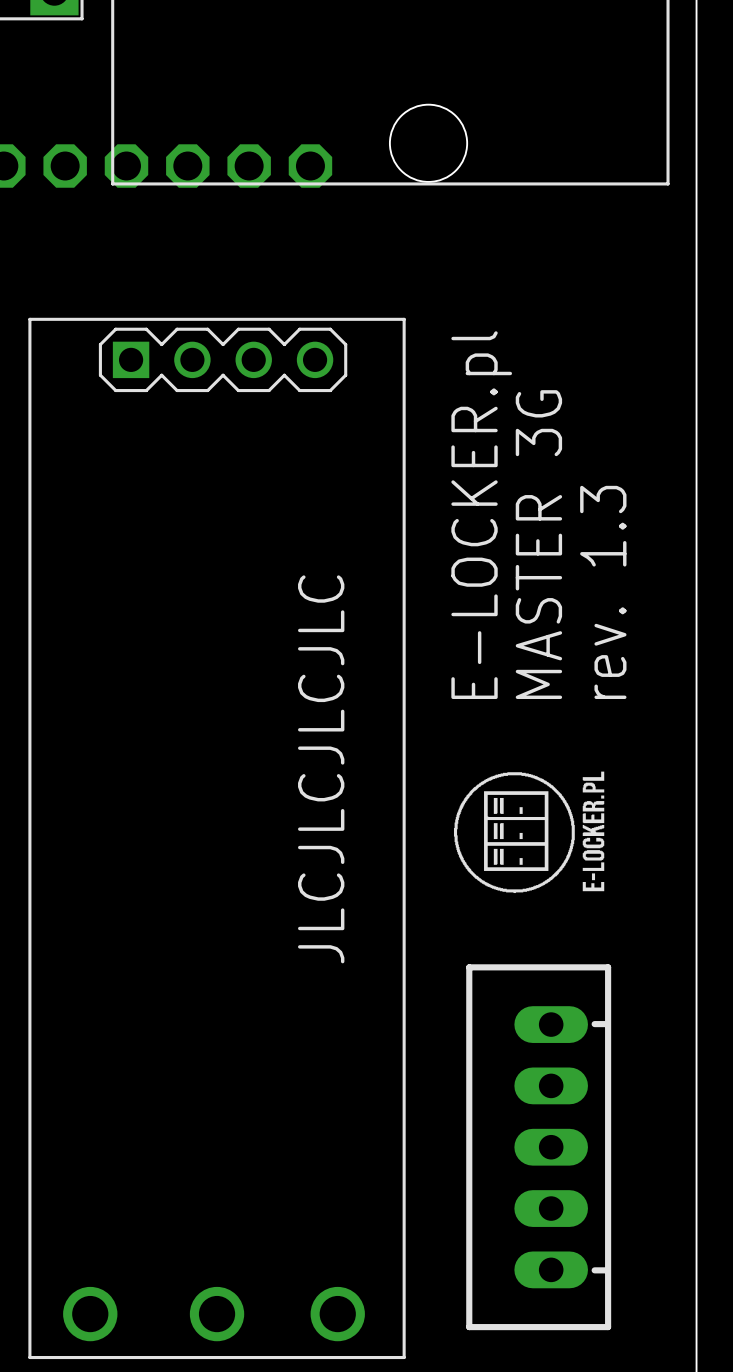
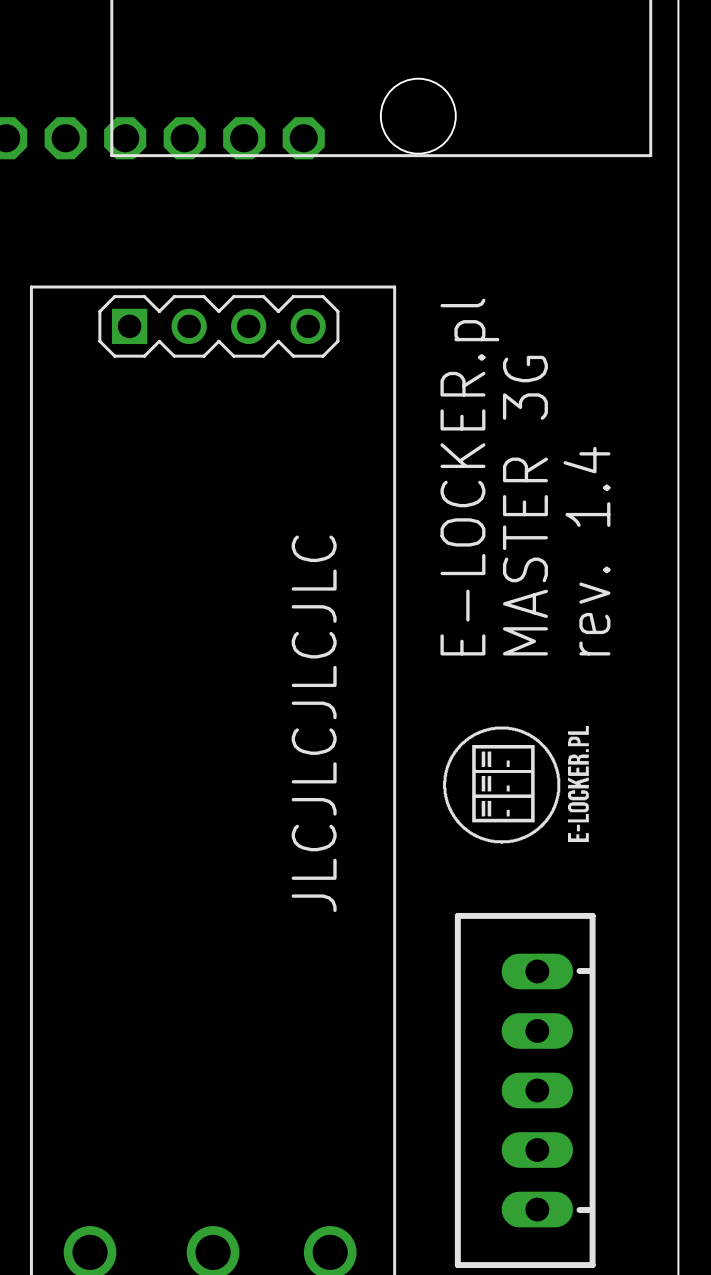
text: rev. 1.3 (603, 592) -> rev. 1.4 (586, 551)

